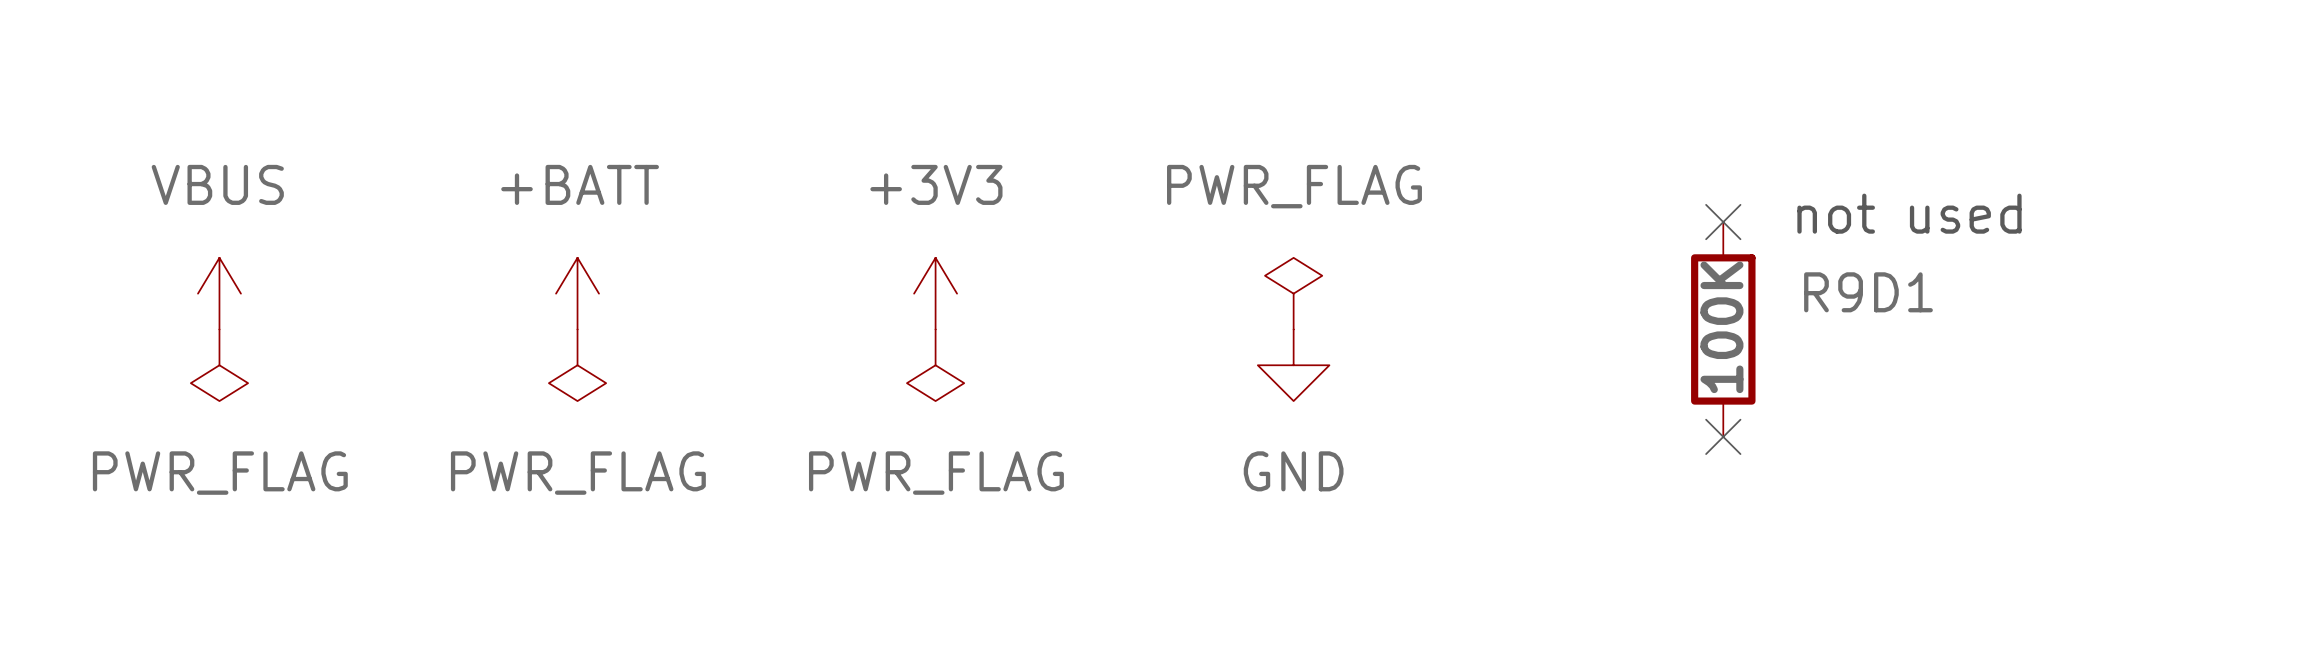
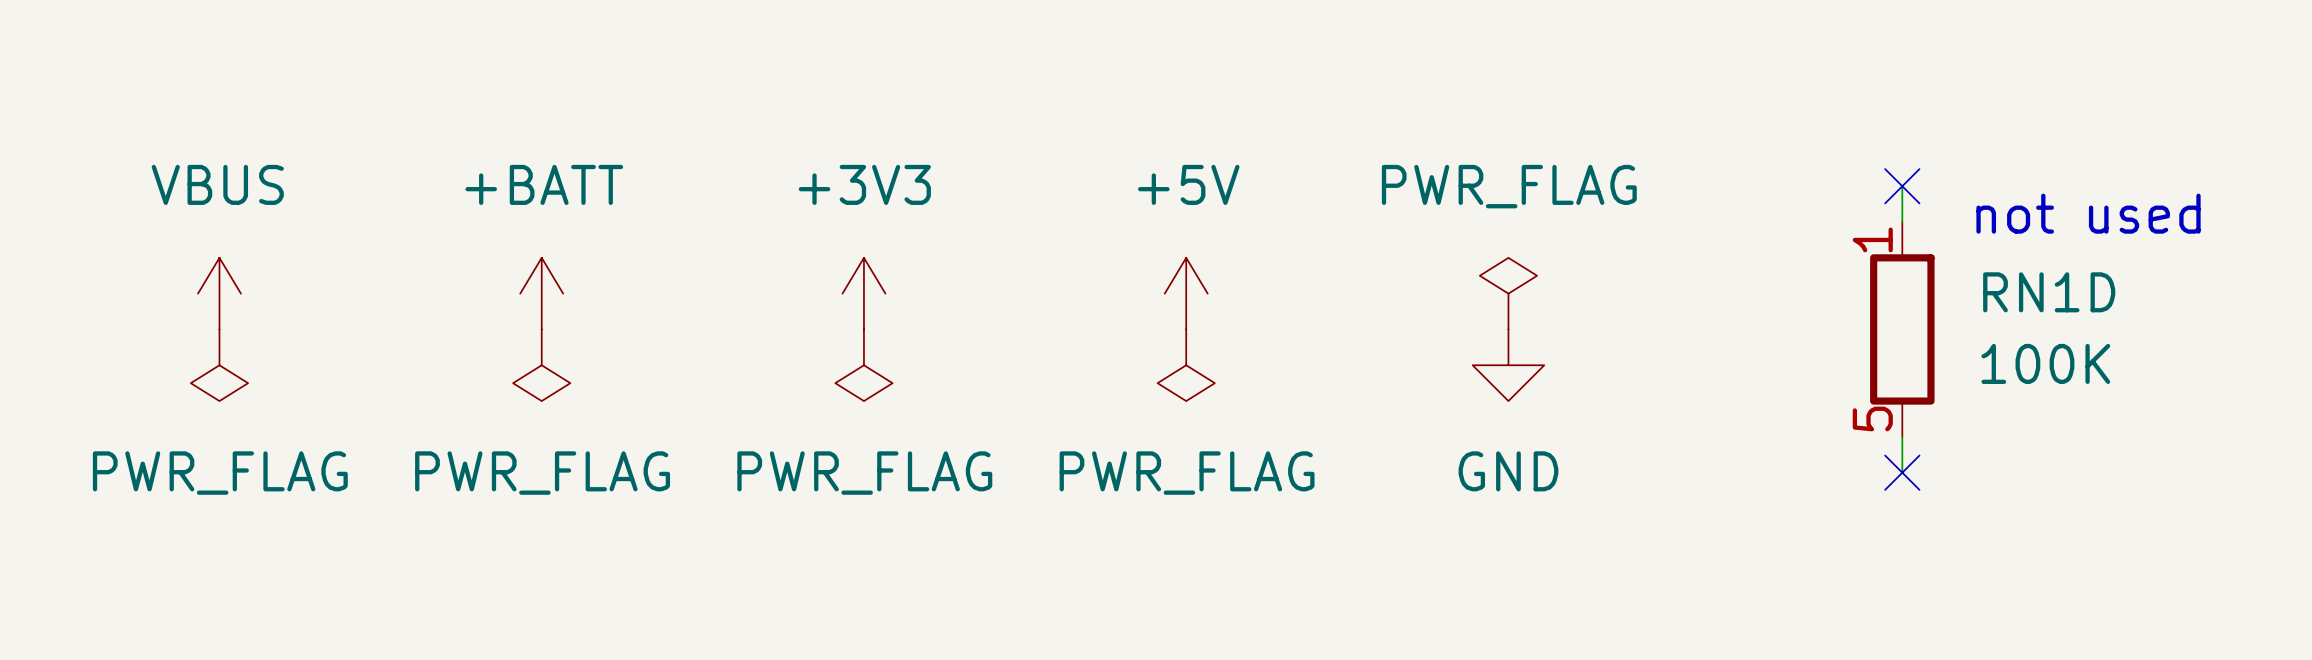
wire: none -> (1902, 186) (1902, 222)
no-connect mark: none -> (1902, 186)
text position: not used (1909, 213) -> not used (2088, 213)
no-connect mark: (1723, 222) -> none
power symbol position: +BATT (577, 293) -> +BATT (541, 293)
power symbol position: +3V3 (935, 293) -> +3V3 (863, 293)
power symbol: none -> +5V (1186, 293)
power symbol: PWR_FLAG (1293, 293) -> none
power symbol: none -> PWR_FLAG (1508, 293)
R9D1: 100K (1723, 329) -> none
RN1D: none -> 100K (1902, 329)
power symbol position: PWR_FLAG (577, 365) -> PWR_FLAG (541, 365)
power symbol position: PWR_FLAG (935, 365) -> PWR_FLAG (863, 365)
power symbol: none -> PWR_FLAG (1186, 365)
power symbol position: GND (1293, 365) -> GND (1508, 365)
no-connect mark: (1723, 436) -> none
wire: none -> (1902, 436) (1902, 472)
no-connect mark: none -> (1902, 472)

